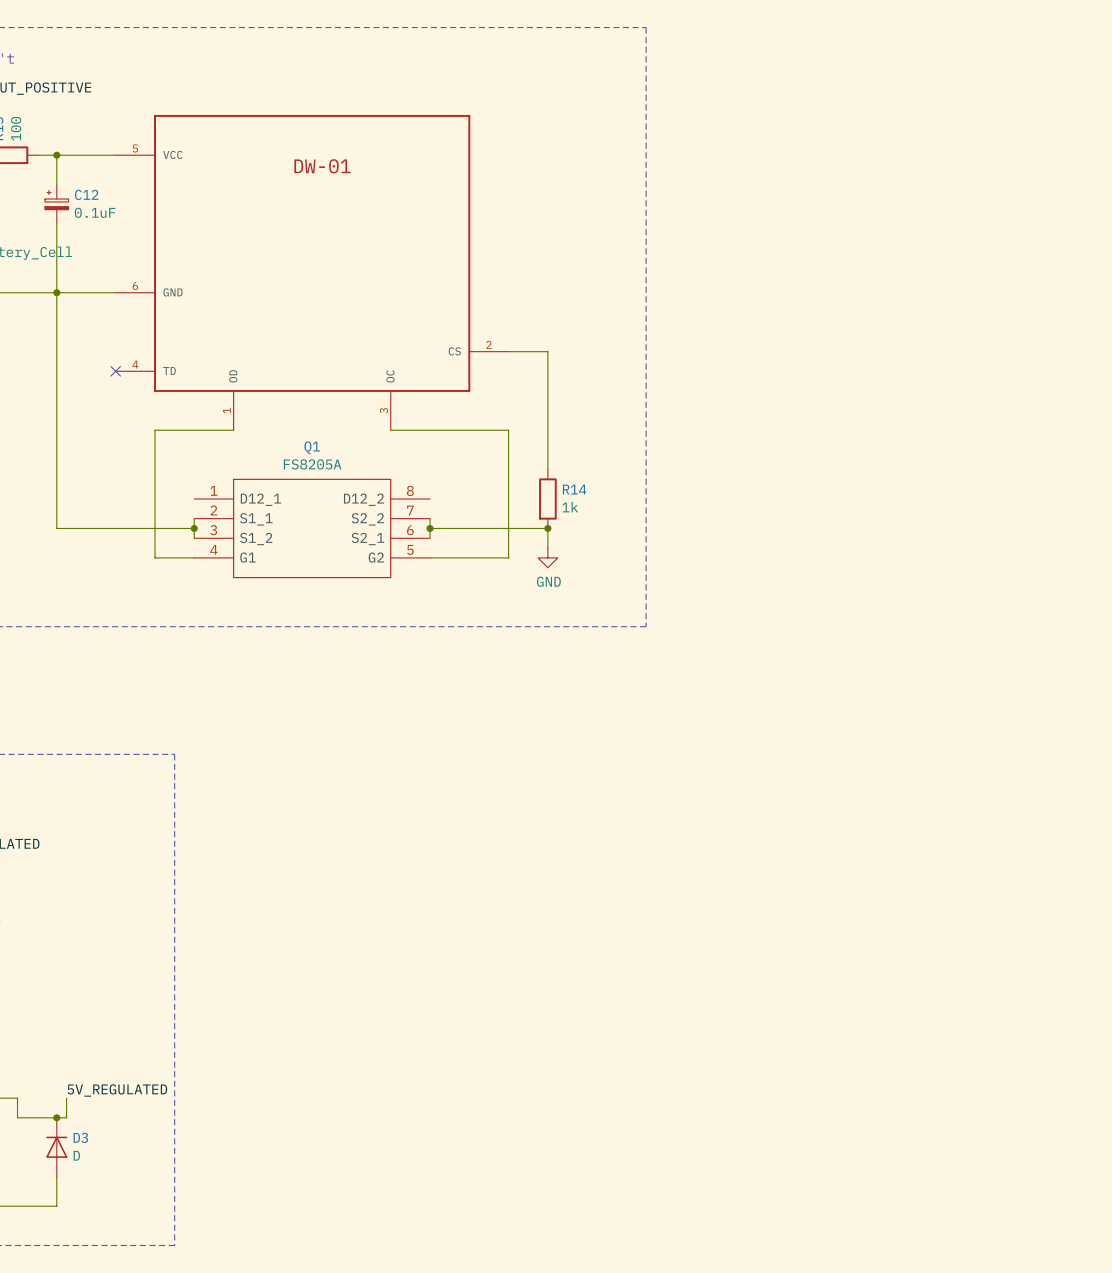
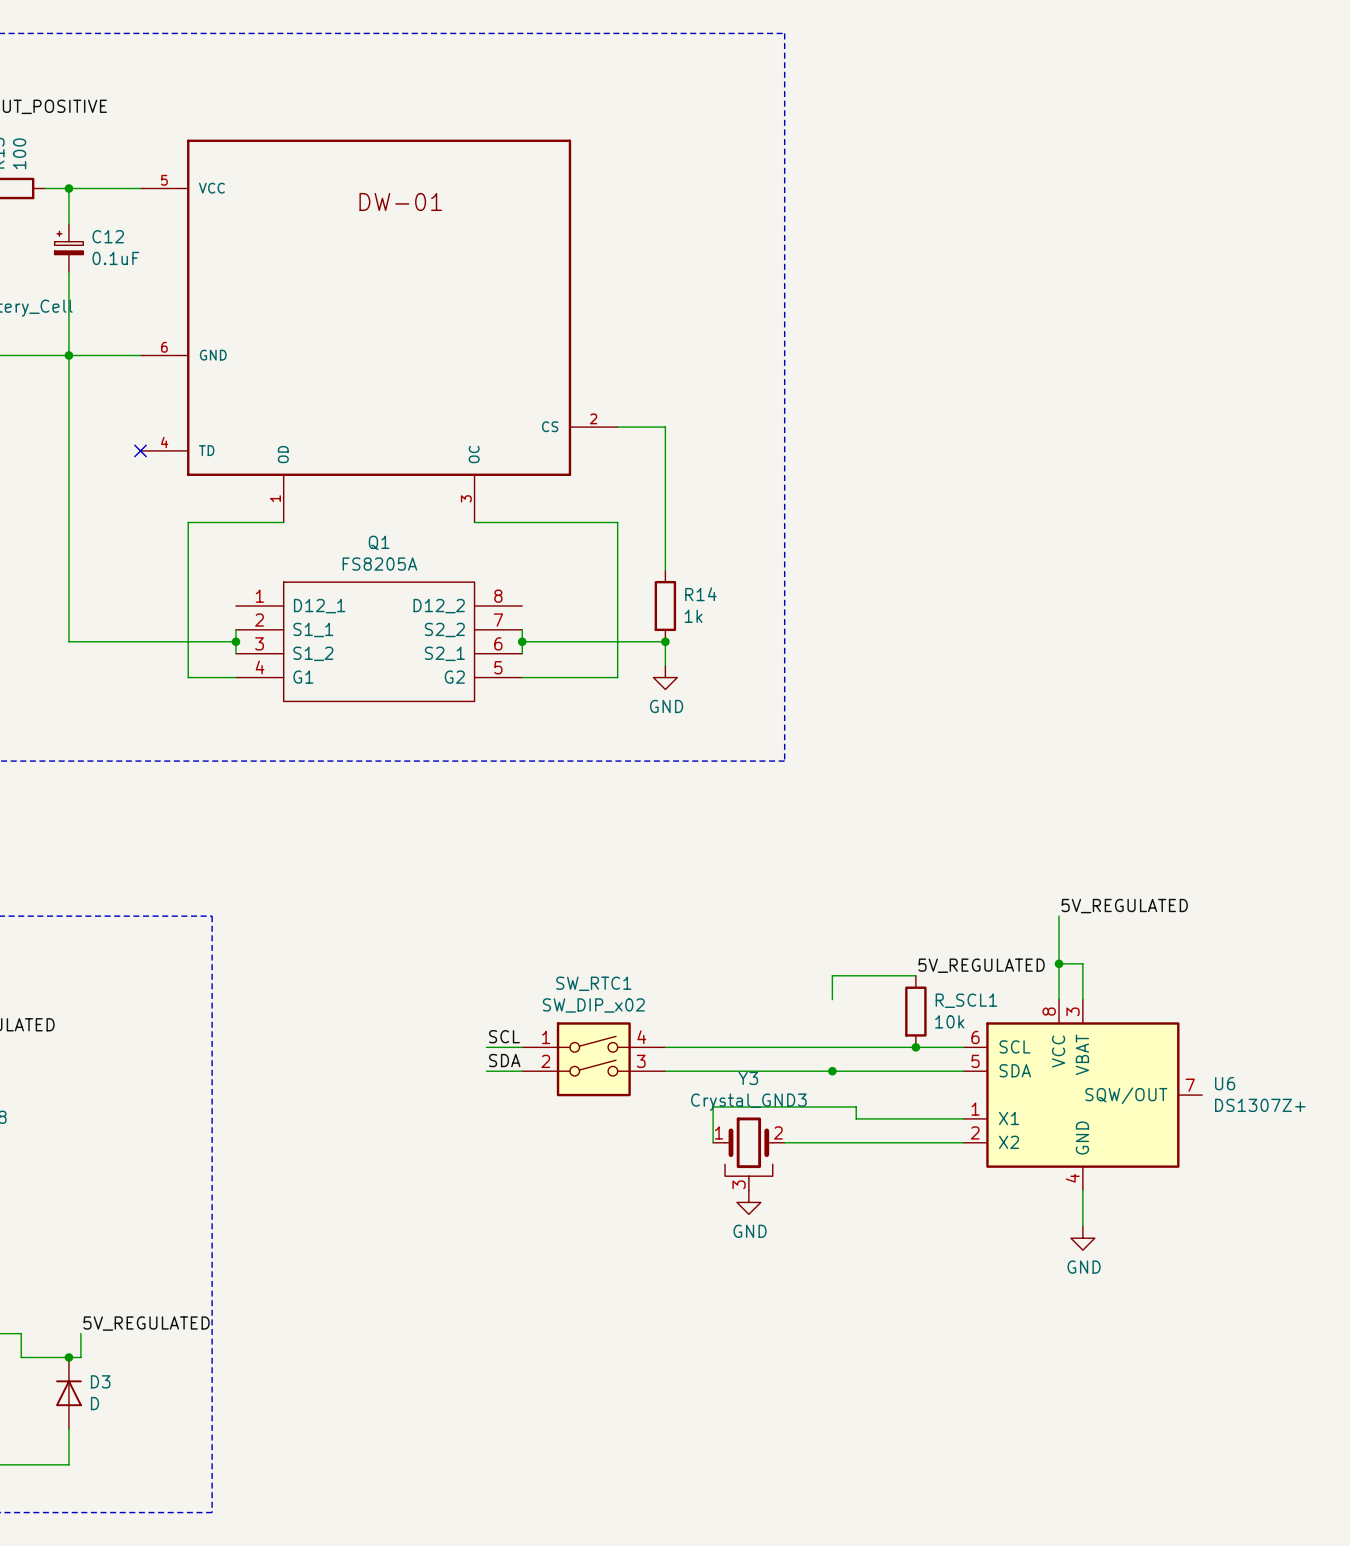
label: none -> 5V_REGULATED (1124, 906)
wire: none -> (1059, 916) (1059, 999)
wire: none -> (1059, 963) (1082, 963) (1082, 999)
junction: none -> (1059, 963)
label: none -> 5V_REGULATED (981, 965)
wire: none -> (915, 975) (832, 975) (832, 999)
R_SCL1: none -> 10k (915, 1011)
label: none -> SCL (504, 1036)
wire: none -> (486, 1047) (522, 1047)
wire: none -> (665, 1047) (963, 1047)
junction: none -> (915, 1047)
SW_RTC1: none -> SW_DIP_x02 (593, 1059)
label: none -> SDA (504, 1060)
wire: none -> (486, 1071) (522, 1071)
wire: none -> (665, 1071) (963, 1071)
junction: none -> (832, 1071)
U6: none -> DS1307Z+ (1082, 1095)
wire: none -> (963, 1118) (856, 1118) (856, 1106) (713, 1106) (713, 1142)
wire: none -> (784, 1142) (963, 1142)
Y3: none -> Crystal_GND3 (748, 1153)
wire: none -> (1082, 1190) (1082, 1226)
power symbol: none -> GND (748, 1202)
power symbol: none -> GND (1082, 1238)

